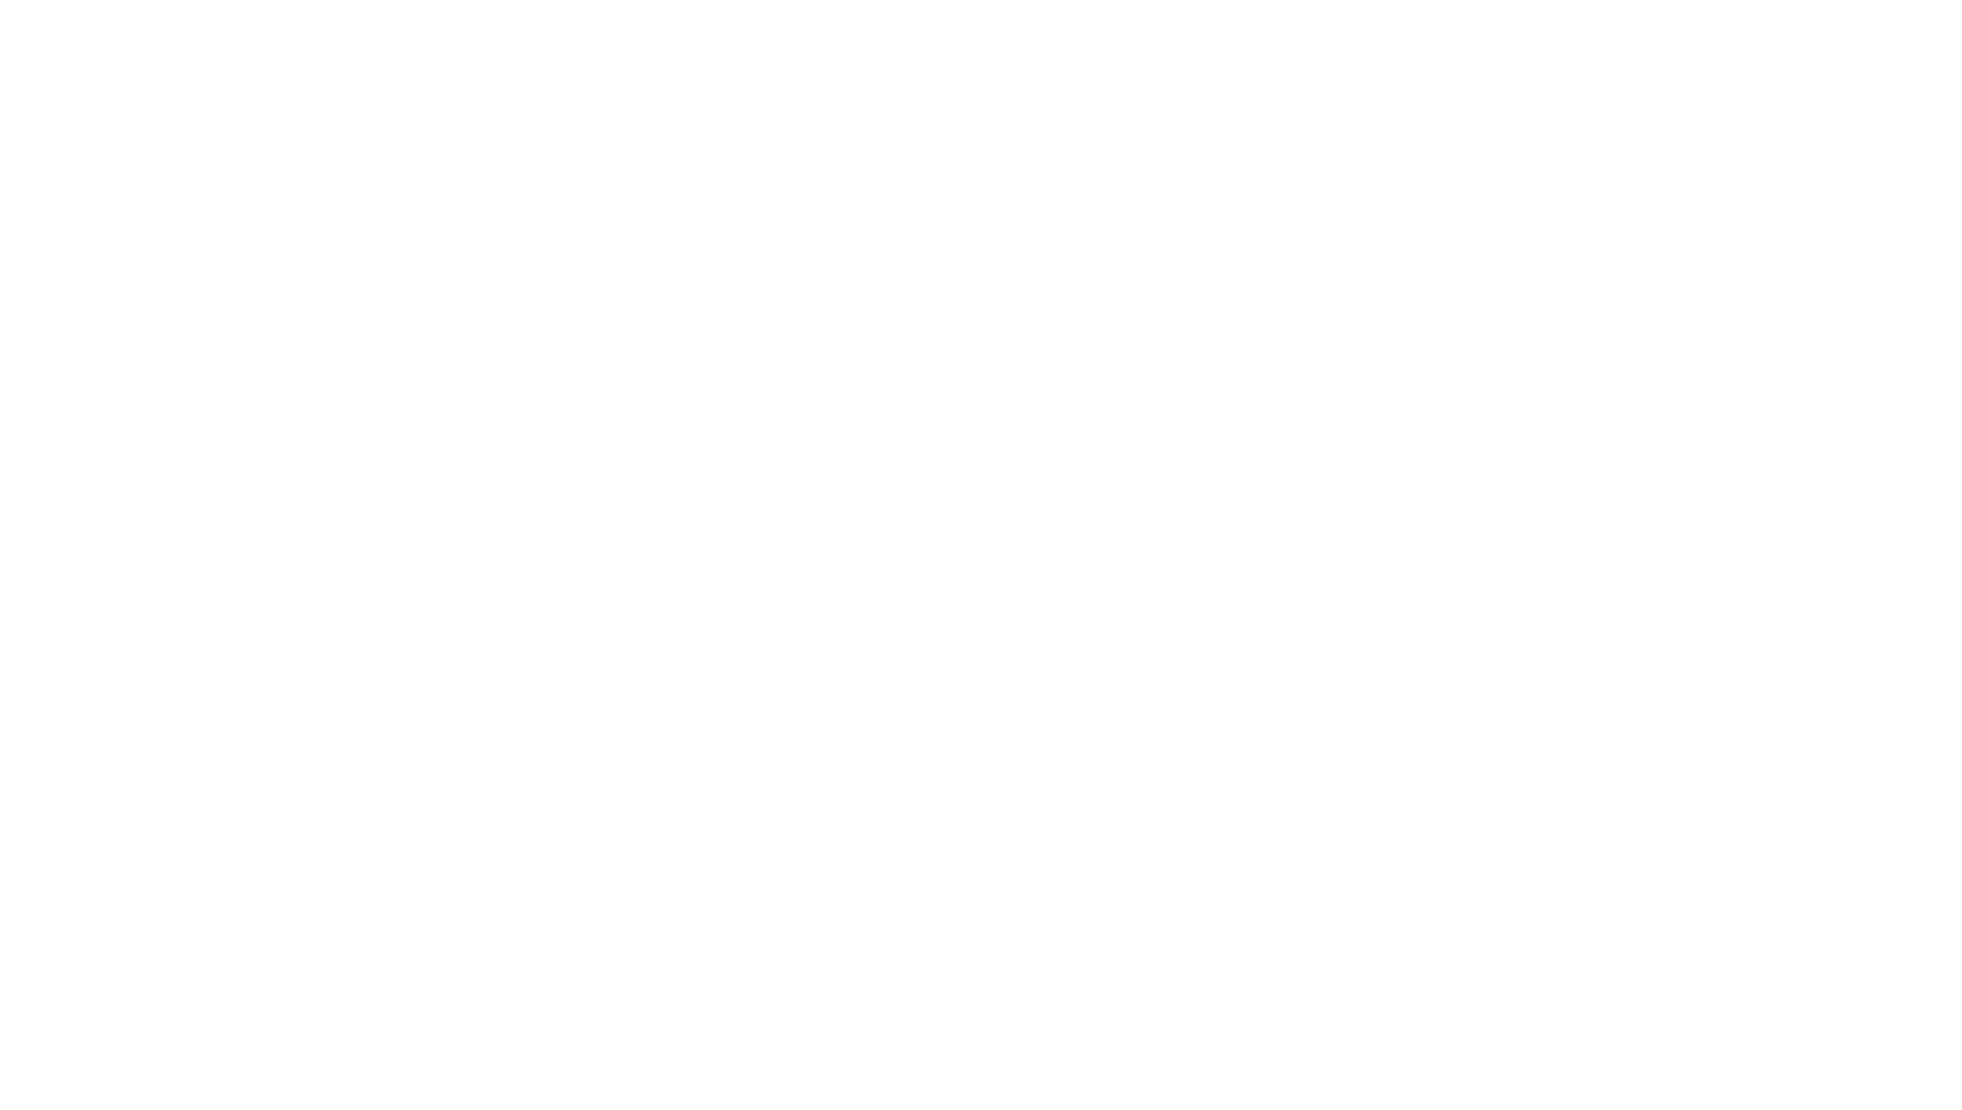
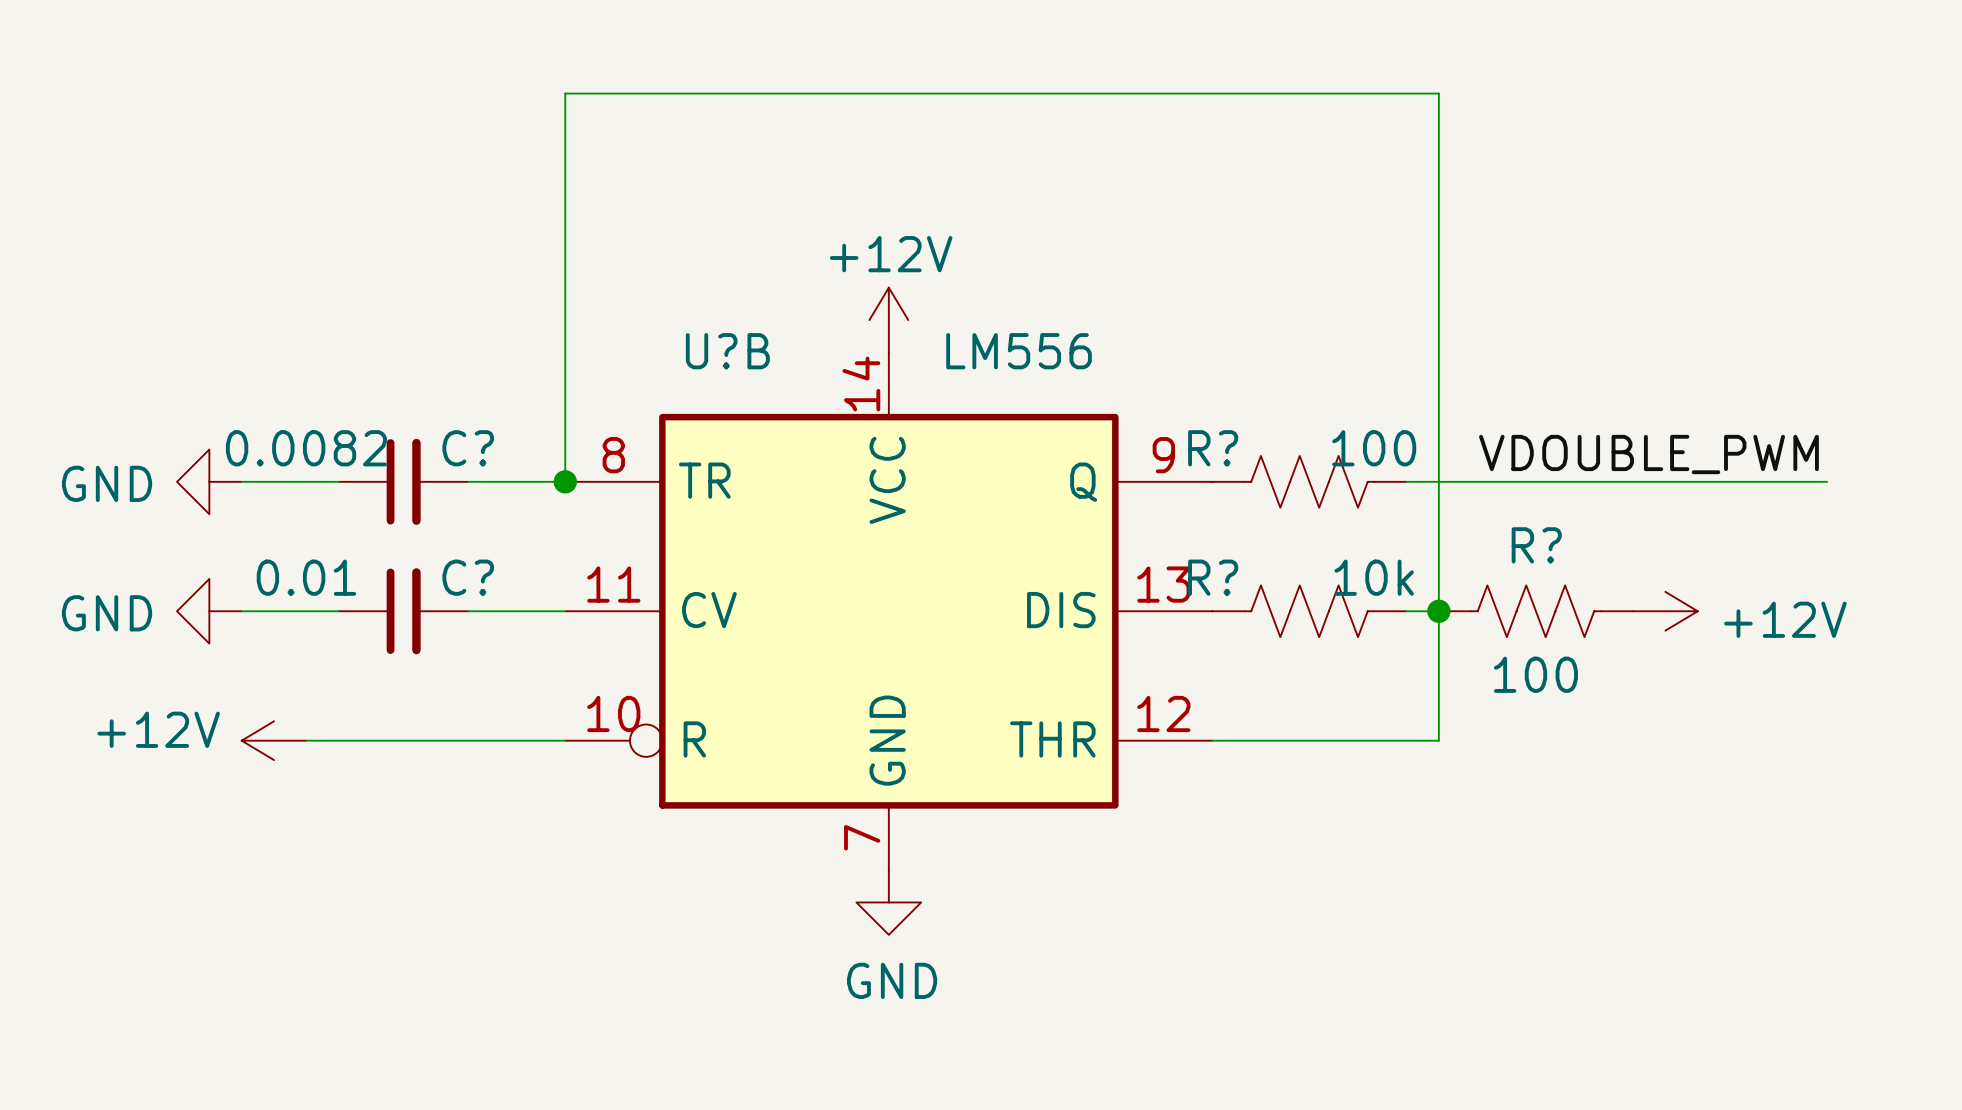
power symbol: none -> +12V (888, 320)
label: none -> VDOUBLE_PWM (1648, 454)
power symbol: none -> GND (209, 481)
wire: none -> (241, 481) (338, 481)
C?: none -> 0.0082 (403, 481)
wire: none -> (468, 481) (565, 481) (565, 93) (1438, 93) (1438, 740) (1212, 740)
junction: none -> (565, 481)
R?: none -> 100 (1309, 481)
wire: none -> (1406, 481) (1827, 481)
power symbol: none -> GND (209, 611)
wire: none -> (241, 611) (338, 611)
C?: none -> 0.01 (403, 611)
wire: none -> (468, 611) (565, 611)
U?B: none -> LM556 (888, 611)
R?: none -> 10k (1309, 611)
wire: none -> (1406, 611) (1438, 611)
junction: none -> (1438, 611)
R?: none -> 100 (1535, 611)
power symbol: none -> +12V (1665, 611)
power symbol: none -> +12V (274, 740)
wire: none -> (306, 740) (565, 740)
power symbol: none -> GND (888, 902)

